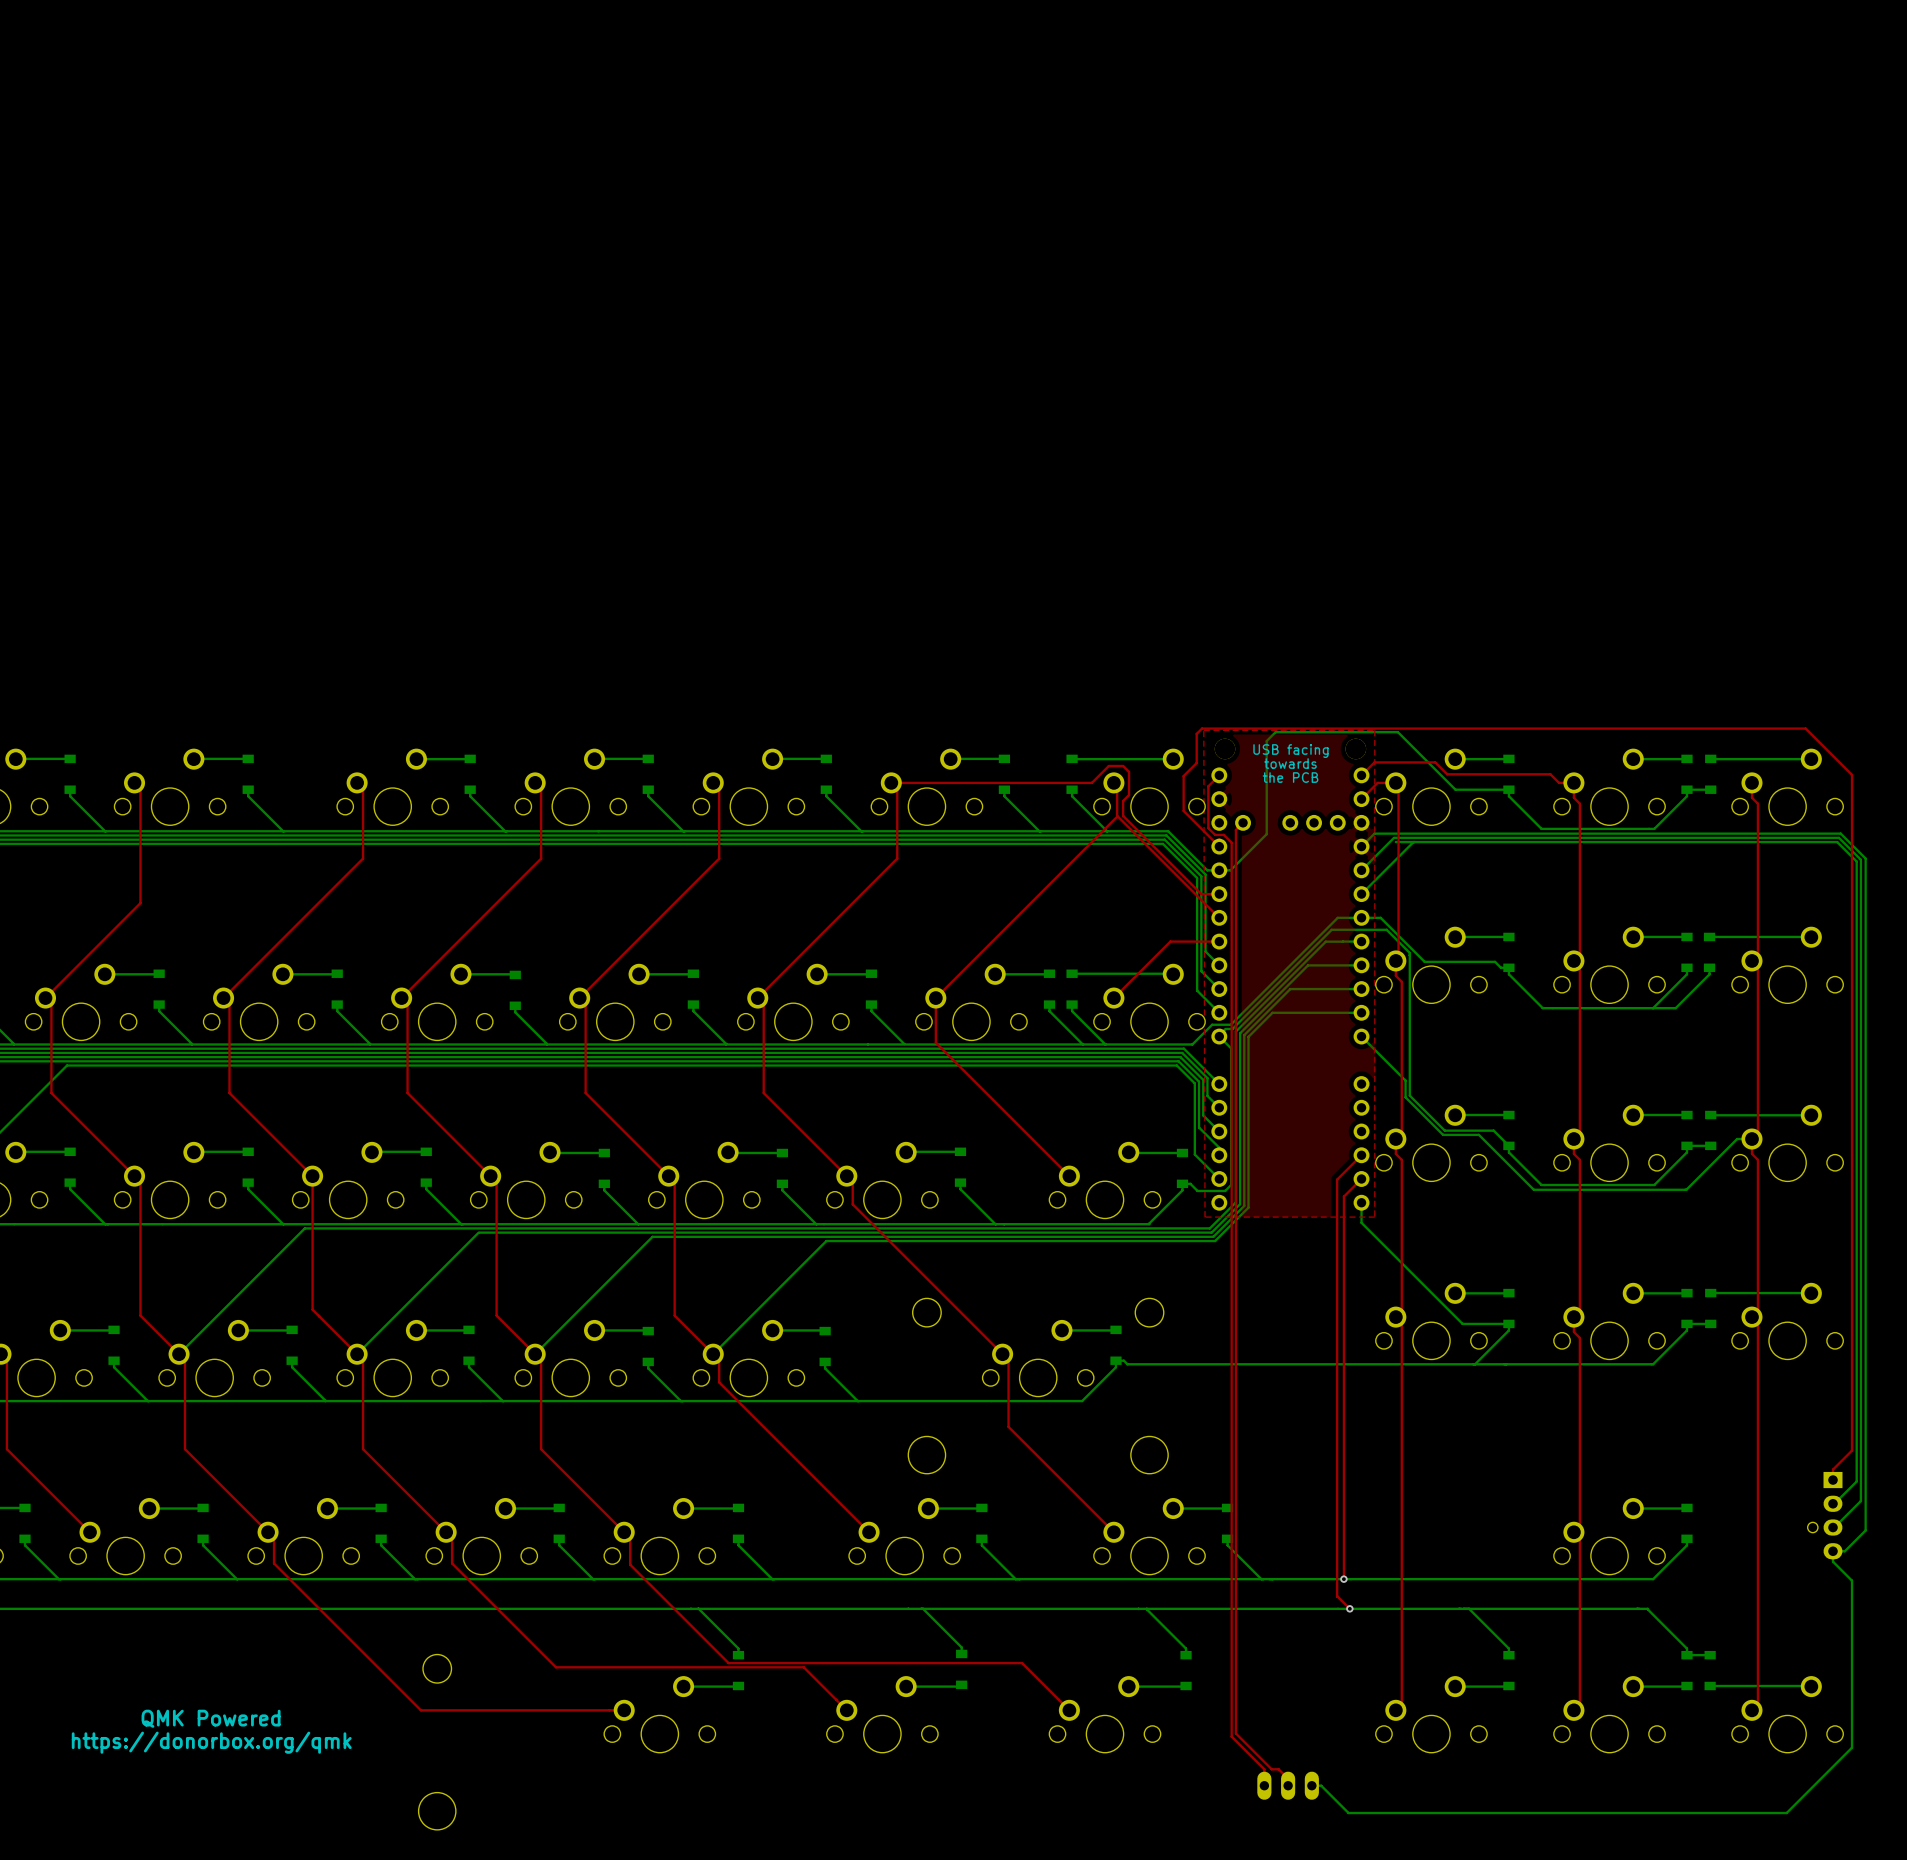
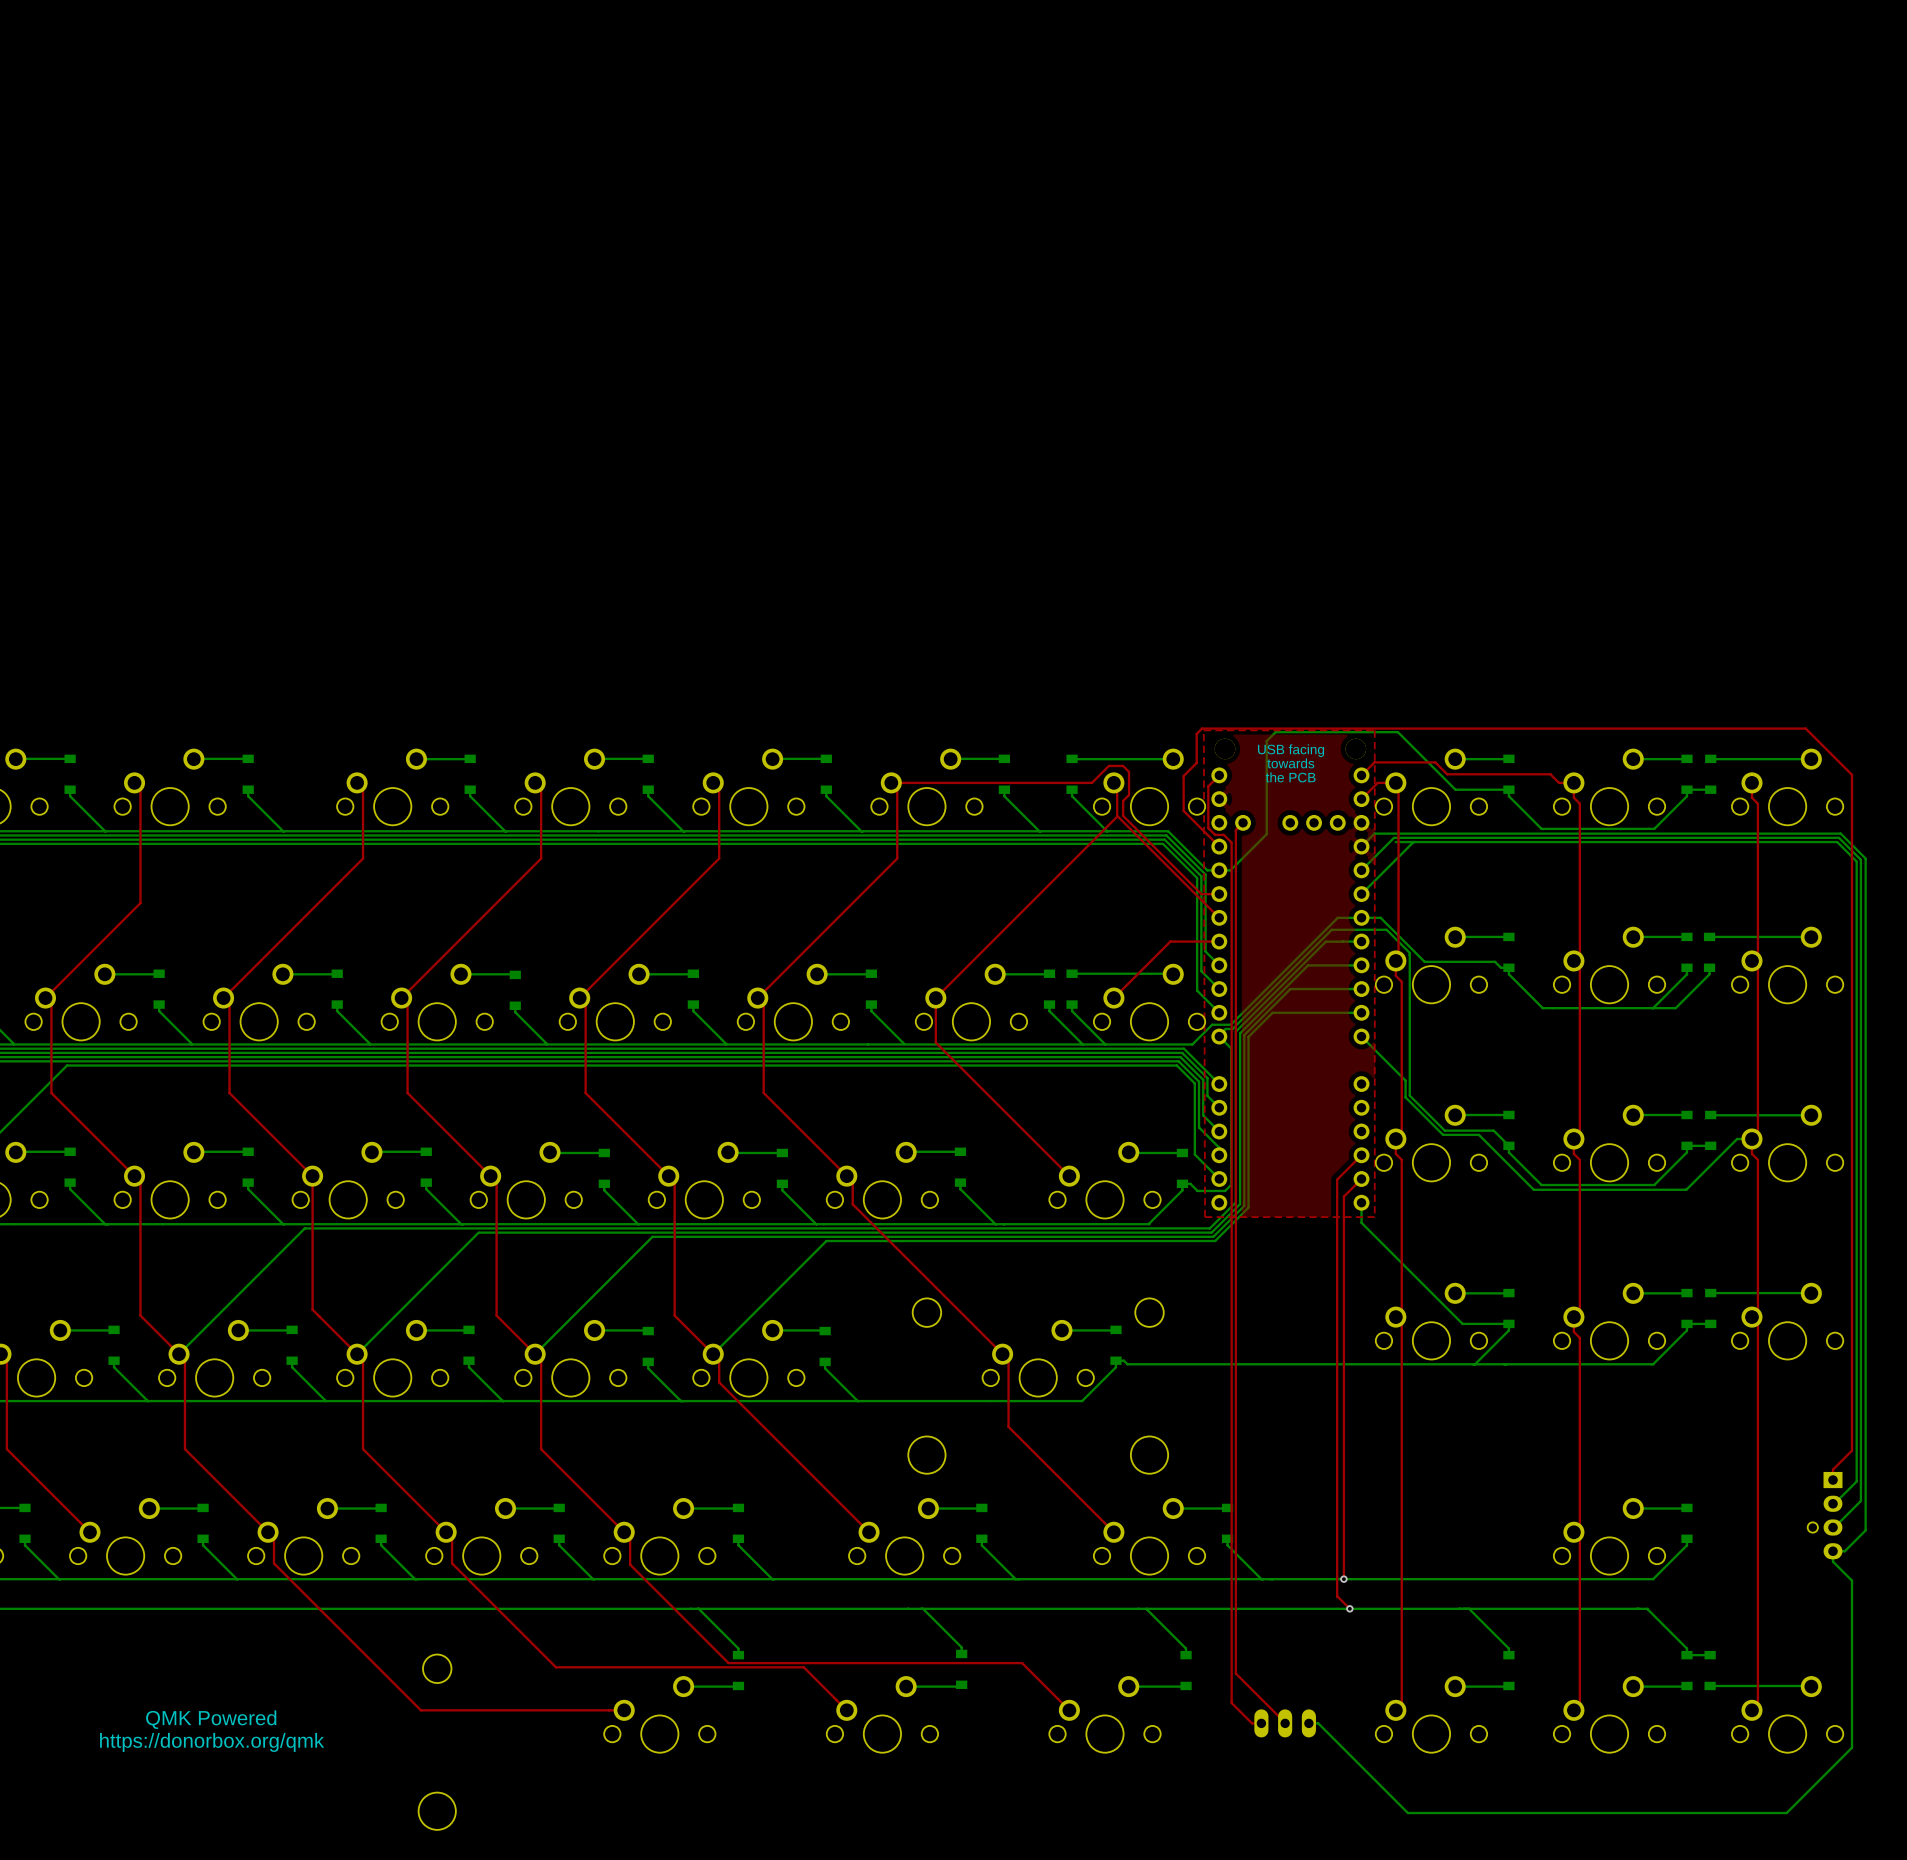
top track: (1235, 1673) (1235, 1733) (1271, 1769) (1278, 1769) (1288, 1778) (1288, 1785) -> (1235, 1673) (1285, 1722)
top track: (1231, 1703) (1231, 1736) (1264, 1769) (1264, 1785) -> (1231, 1703) (1252, 1723) (1261, 1723)
part position: (1288, 1785) -> (1285, 1723)
bottom track: (1311, 1785) (1321, 1785) (1348, 1813) (1407, 1813) -> (1308, 1723) (1318, 1723) (1407, 1813)

